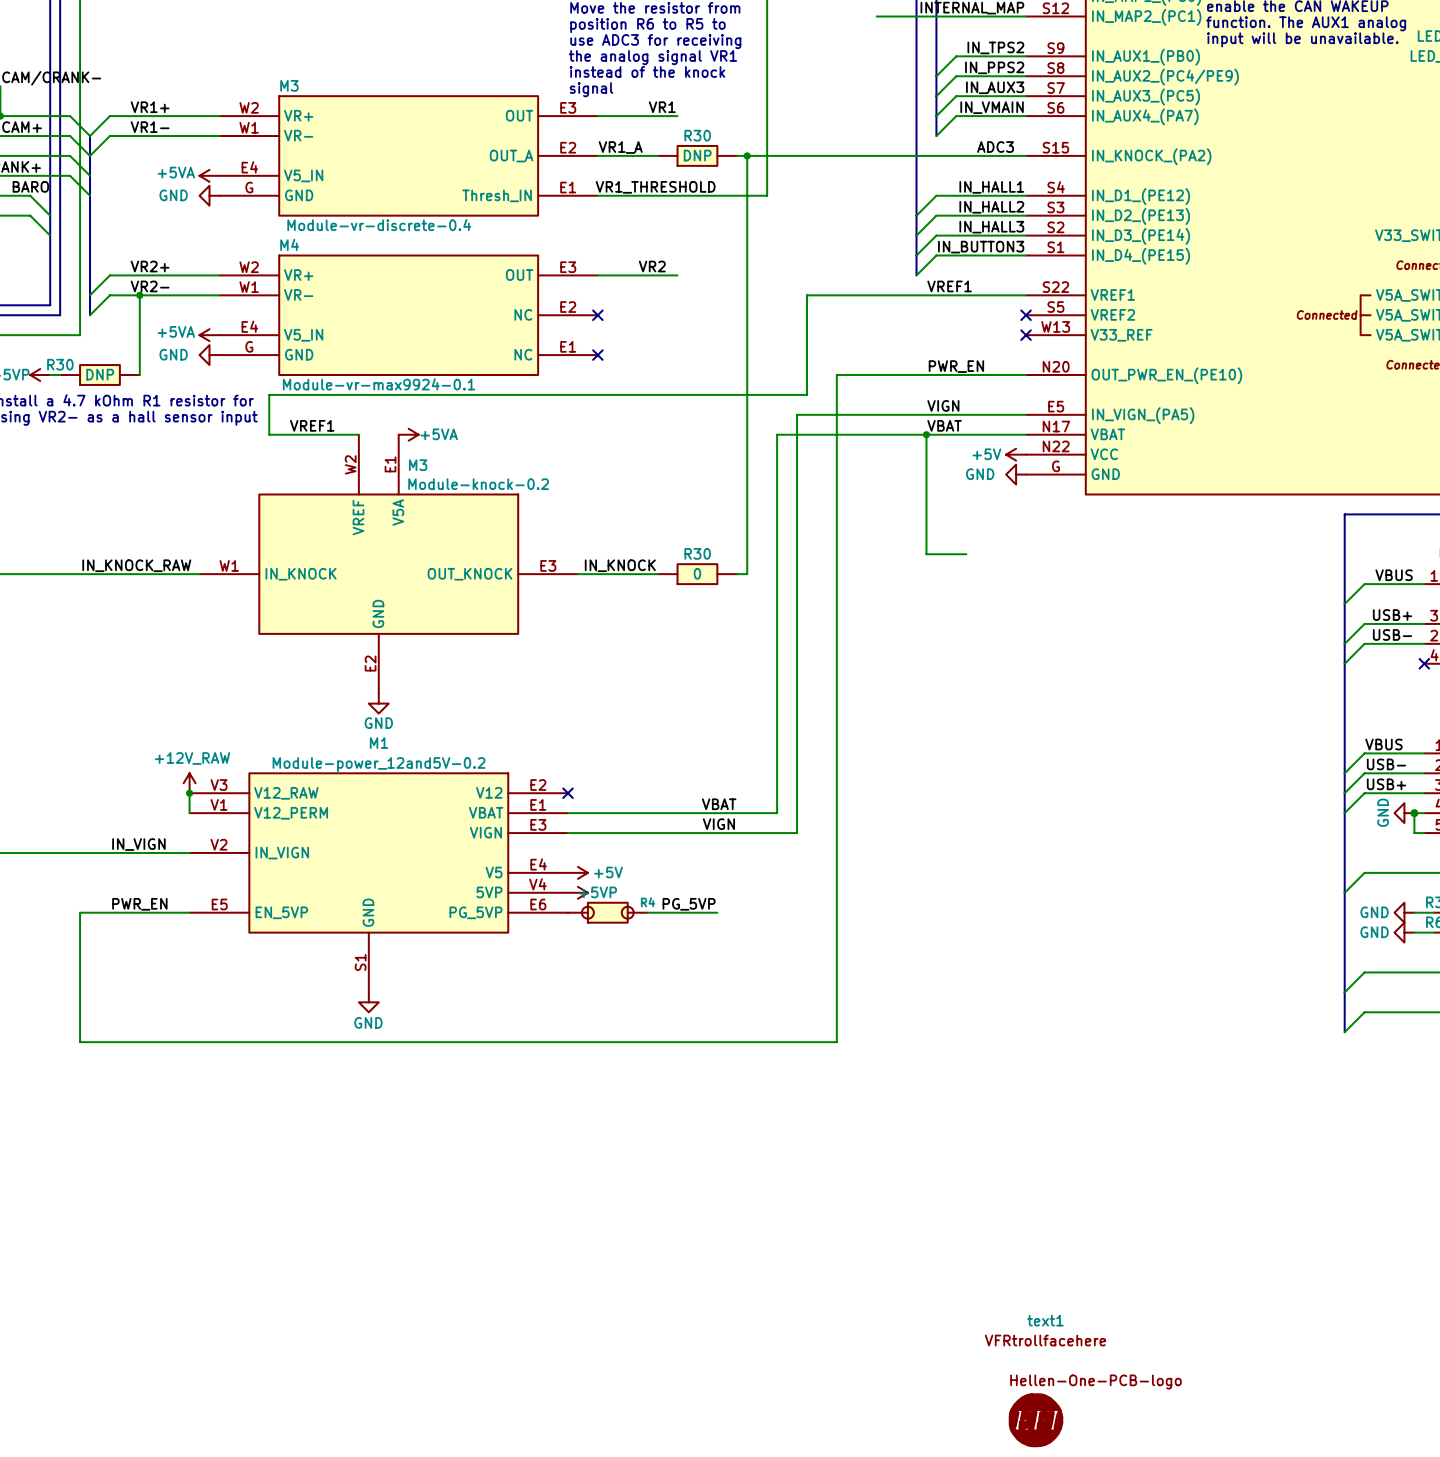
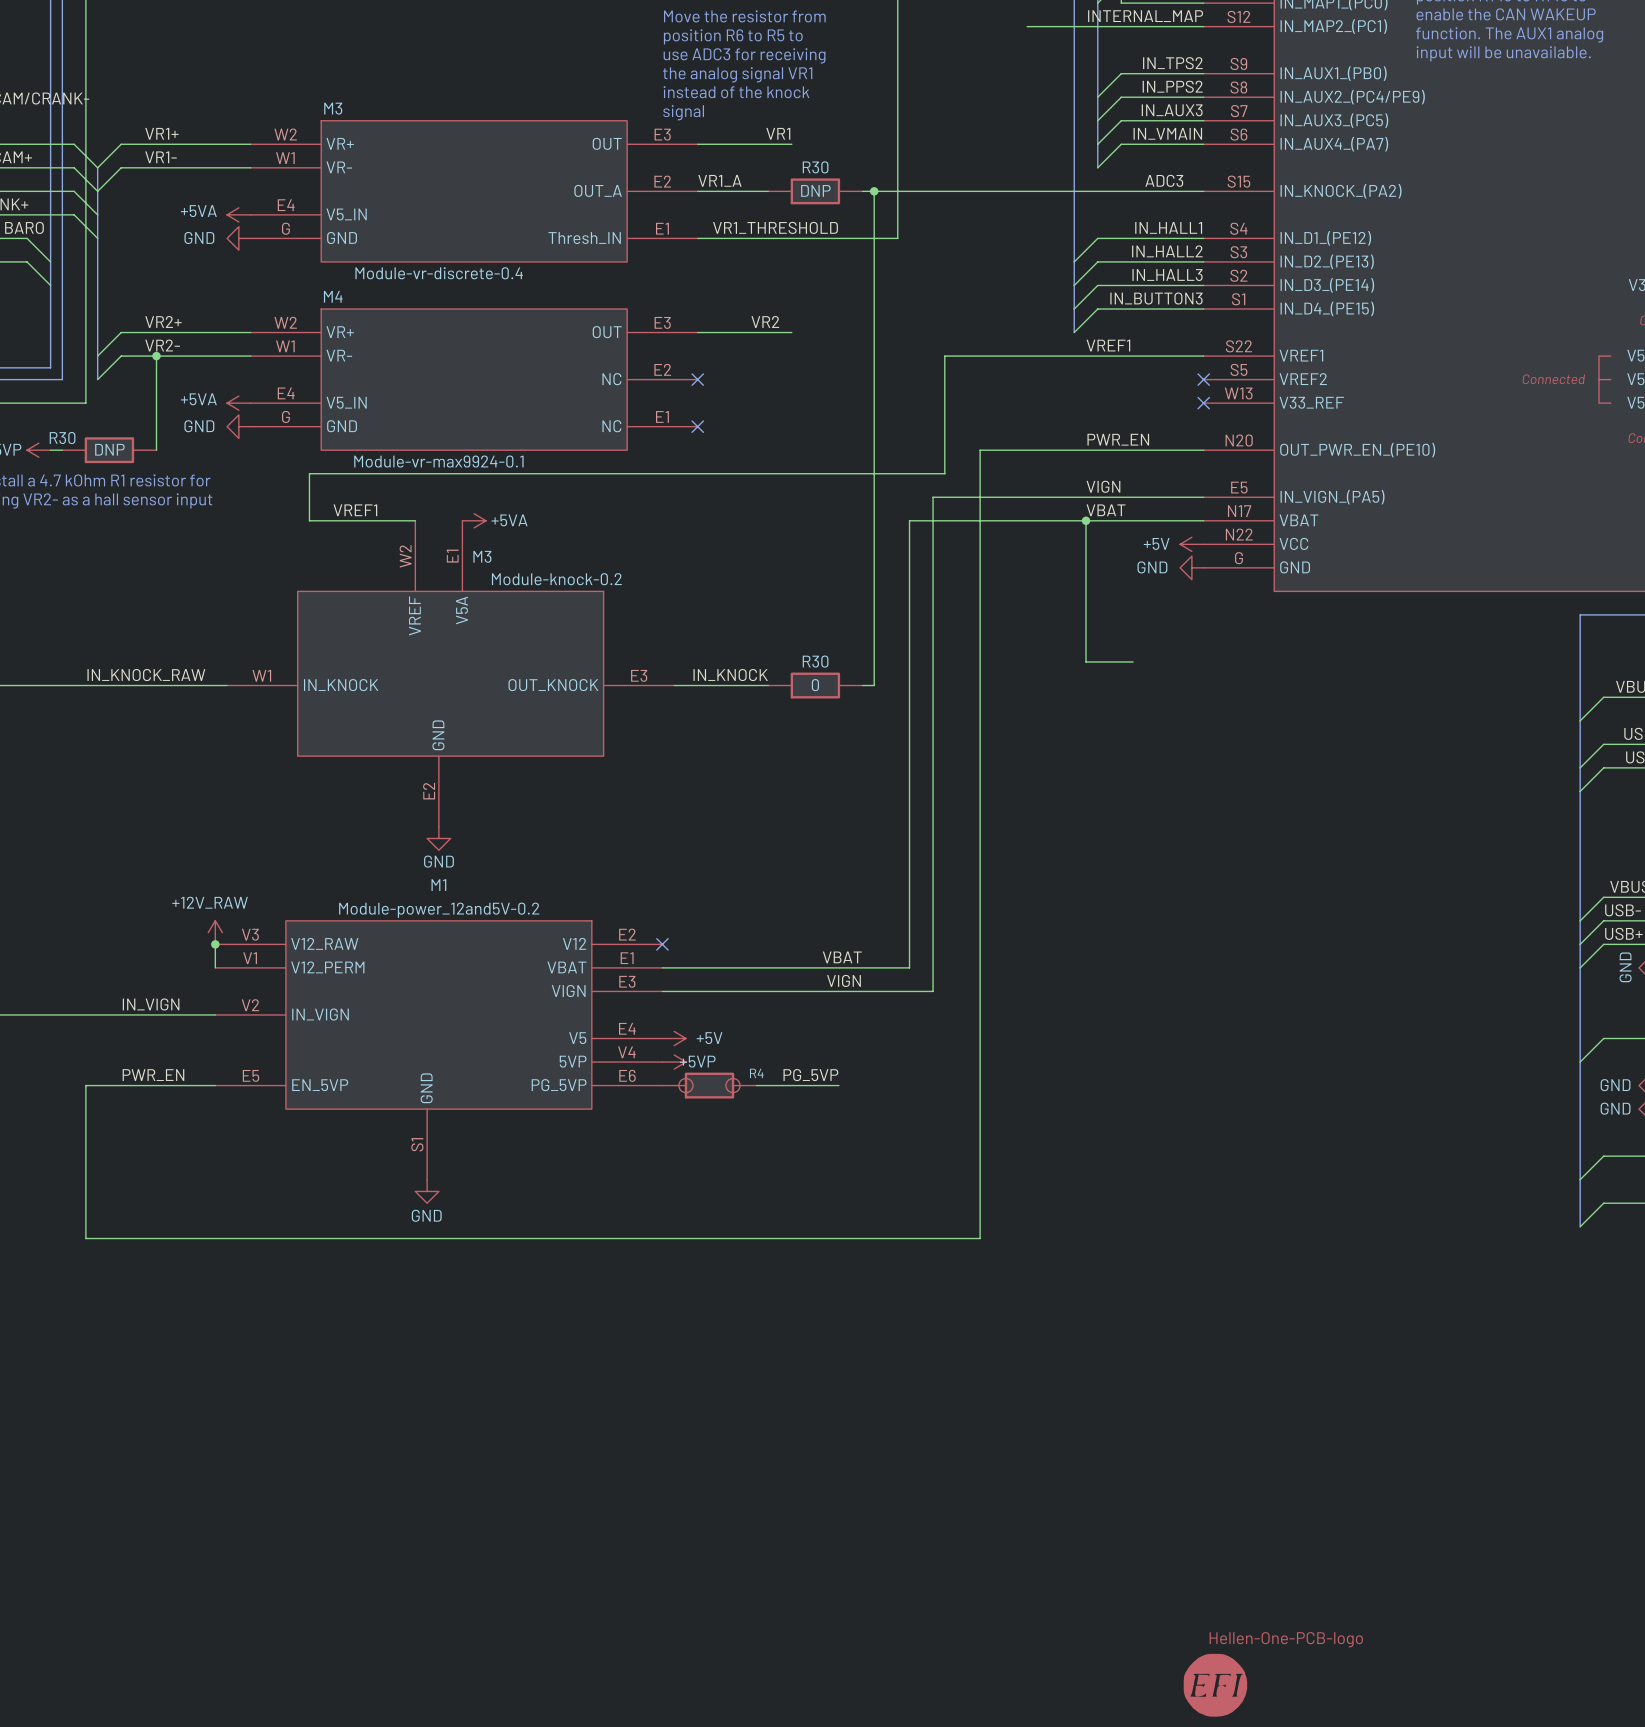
text1: (1045, 1330) -> none

